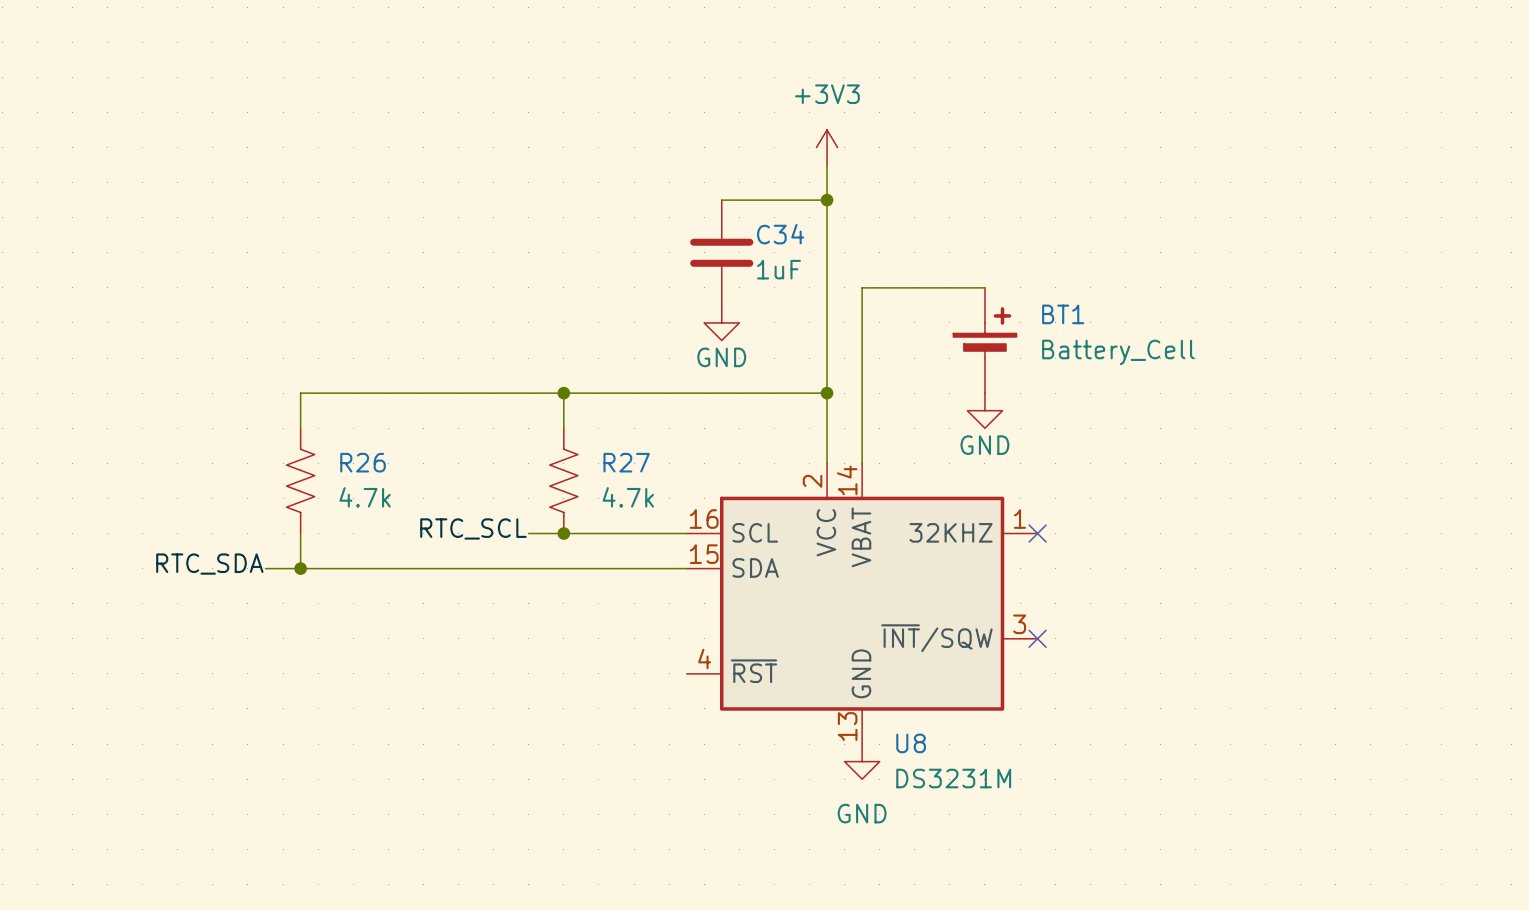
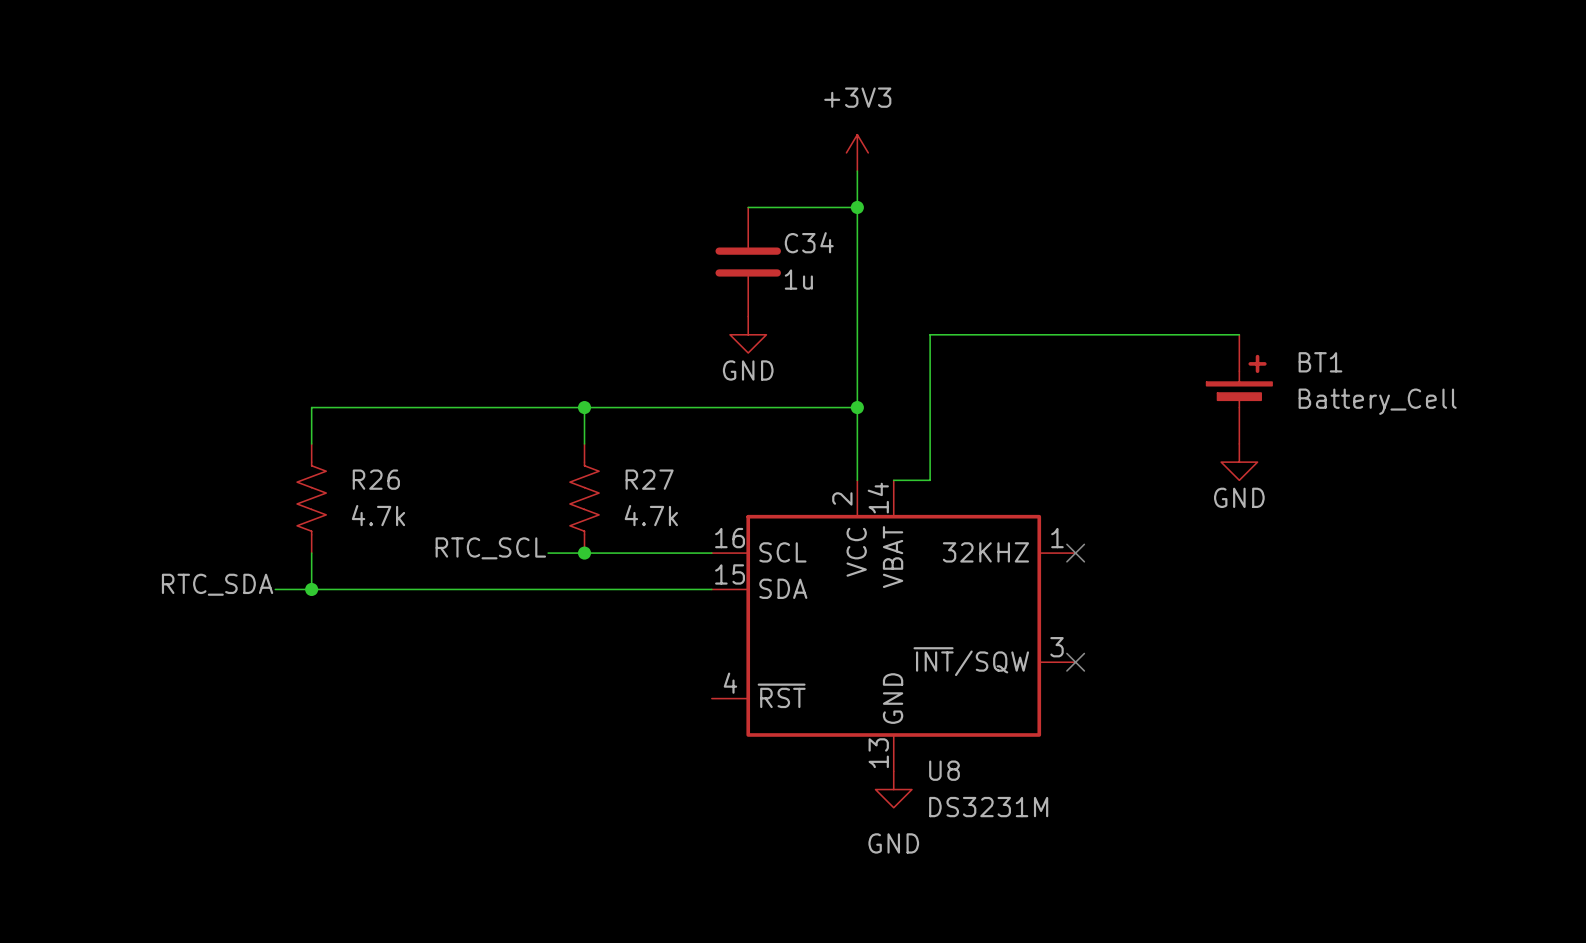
C34 value: 1uF (778, 269) -> 1u (798, 279)
wire: (984, 287) (862, 287) (862, 463) -> (1239, 334) (930, 334) (930, 480) (893, 480)
BT1 position: (984, 340) -> (1239, 389)
power symbol position: GND (984, 410) -> GND (1239, 462)

